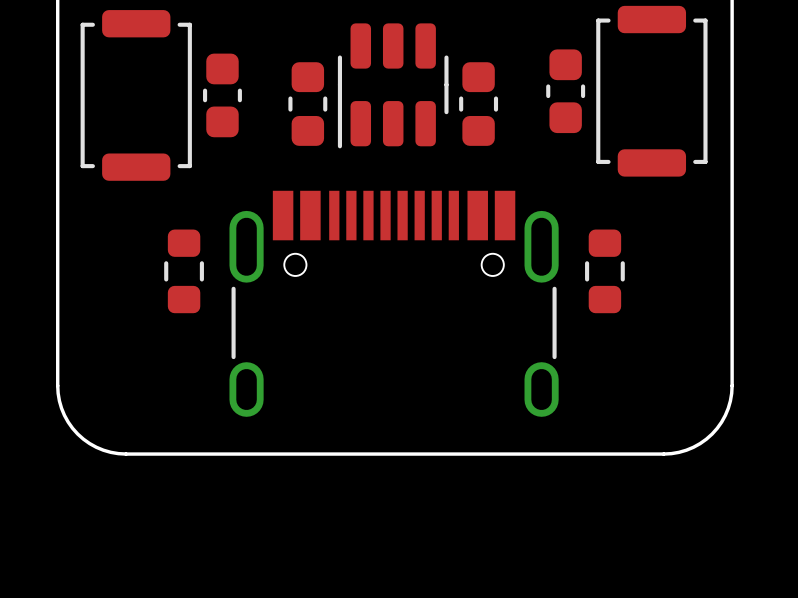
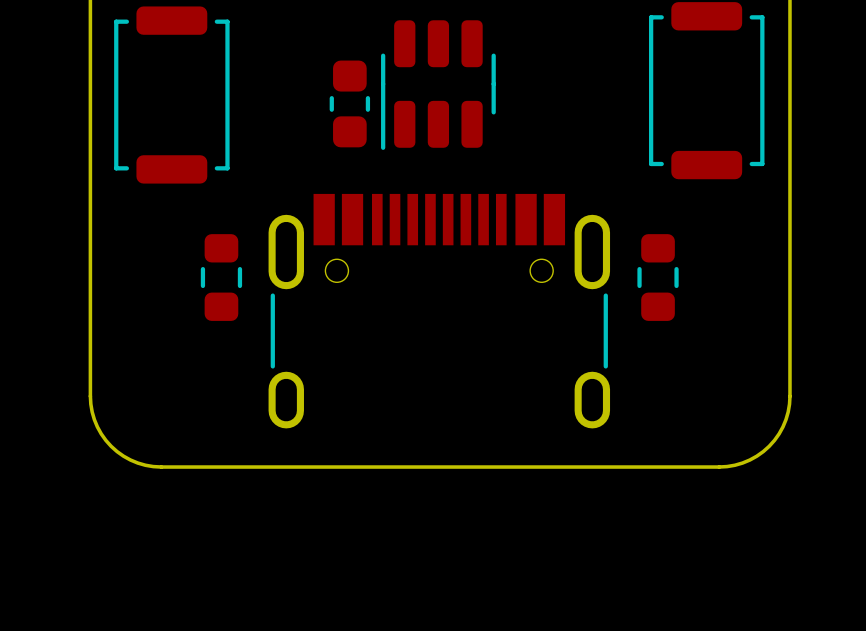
part: (565, 91) -> none
part: (222, 95) -> none
part: (478, 104) -> none

